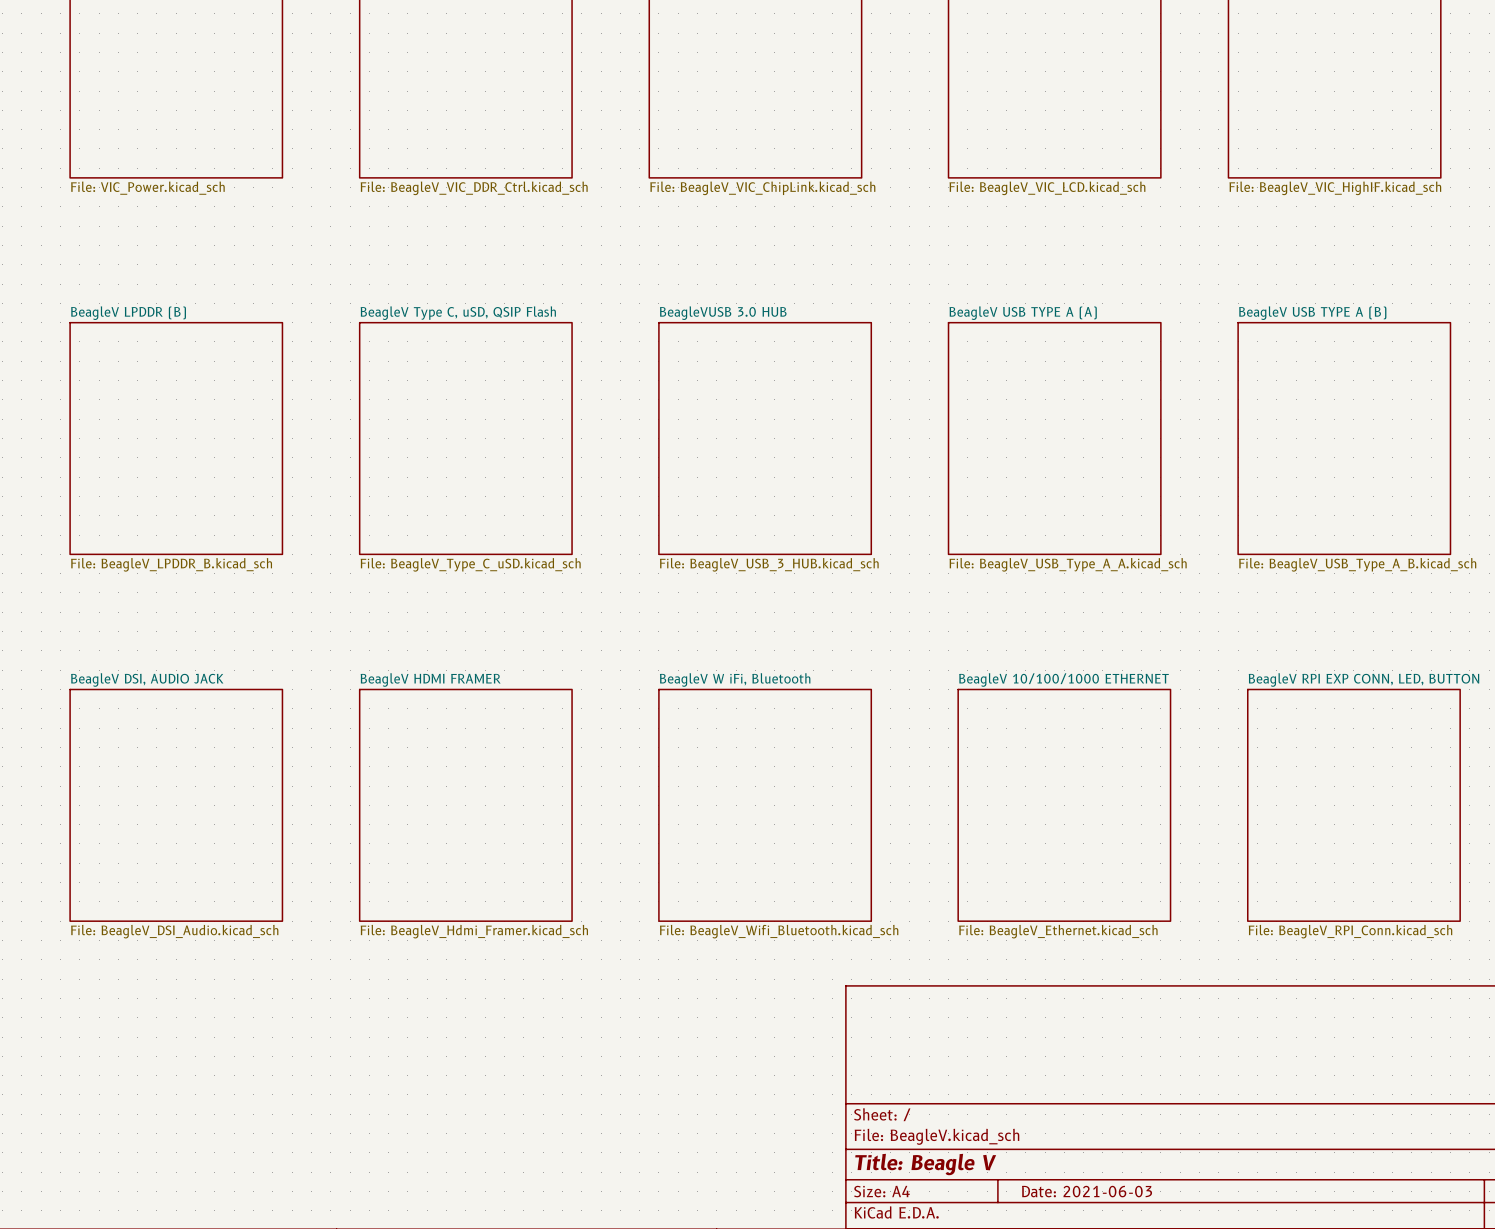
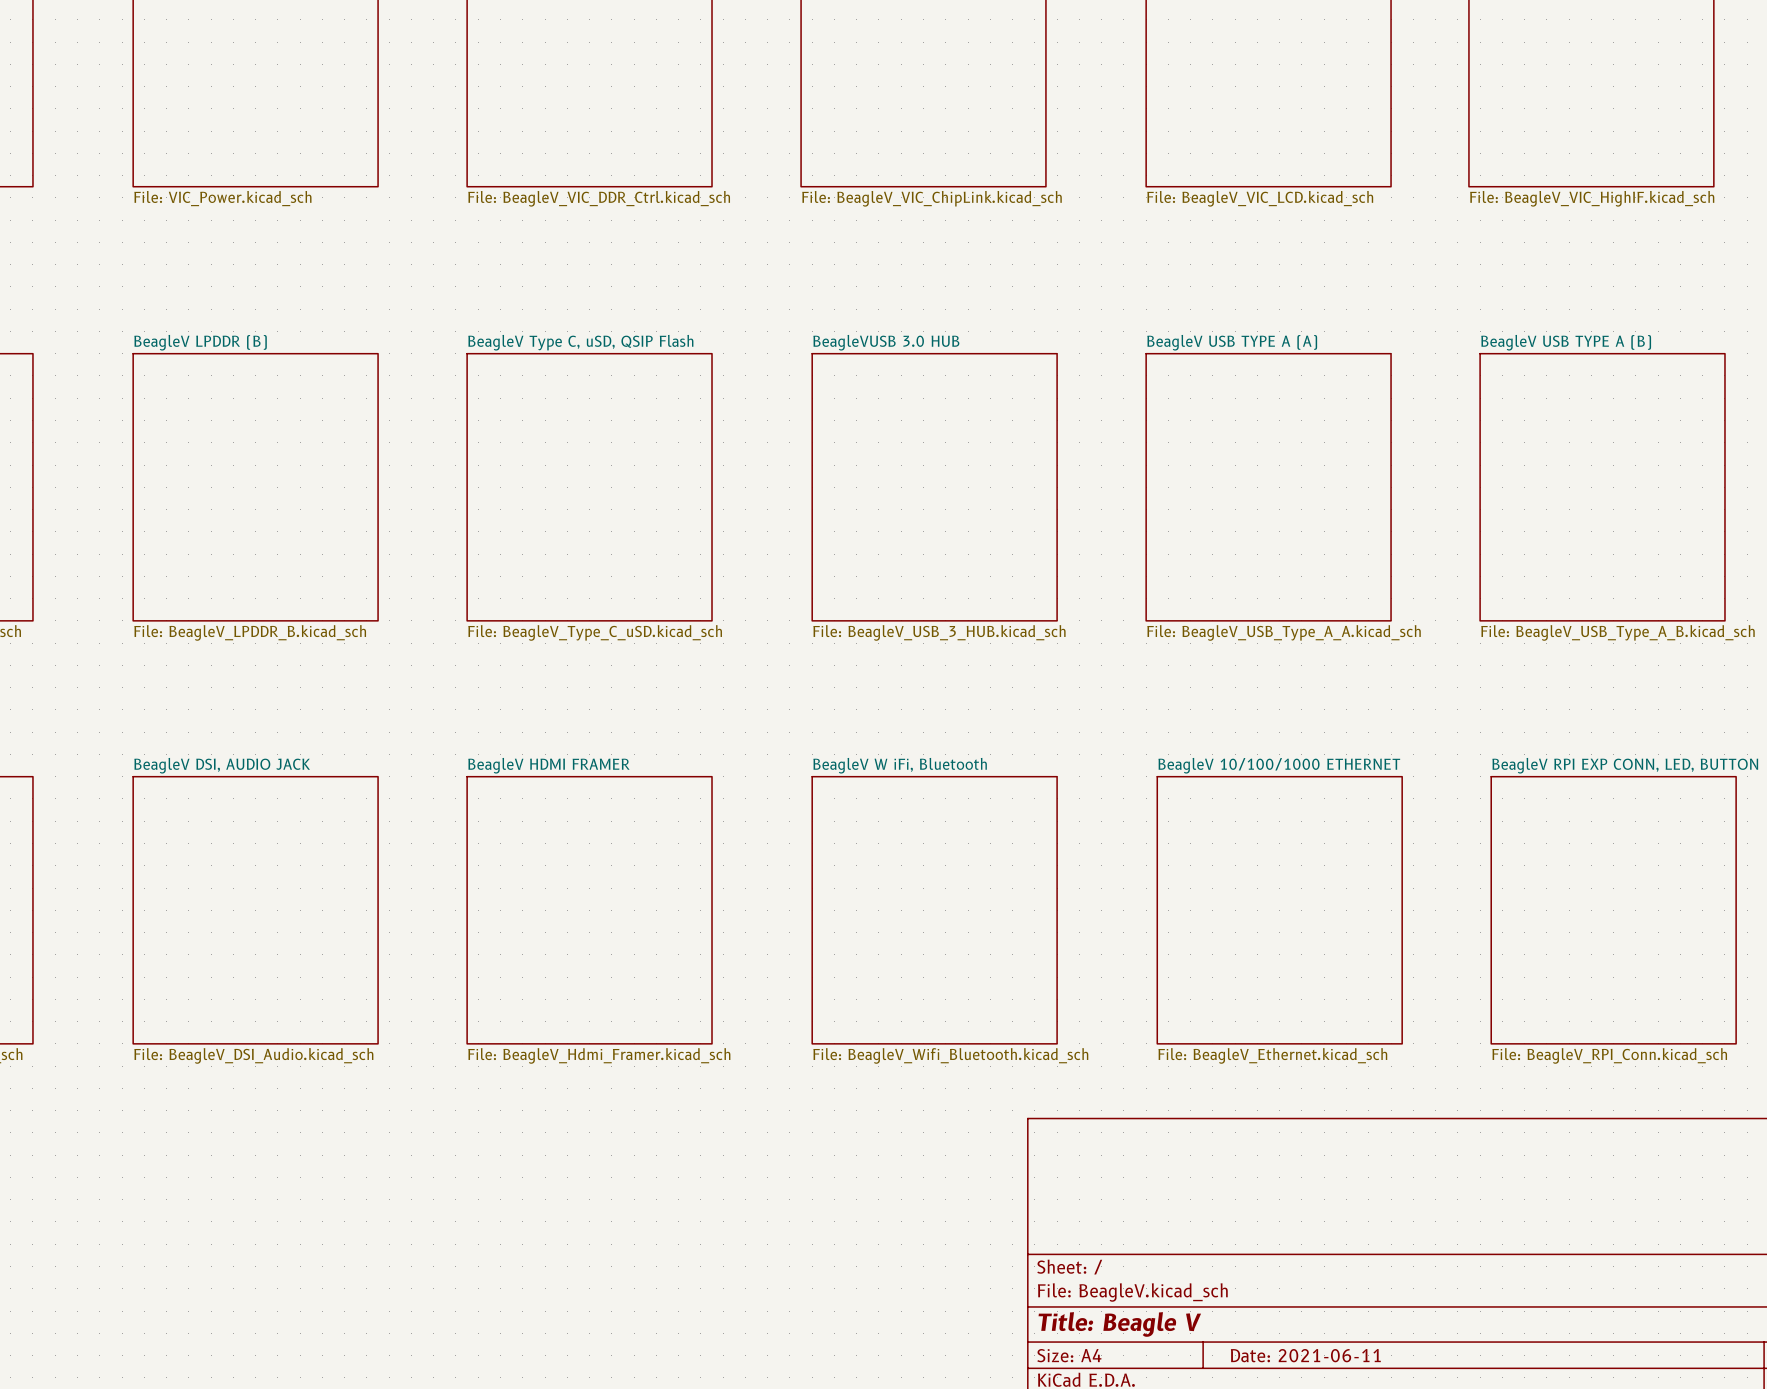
title block: Date: 2021-06-03 (1087, 1191) -> Date: 2021-06-11 (1305, 1355)

